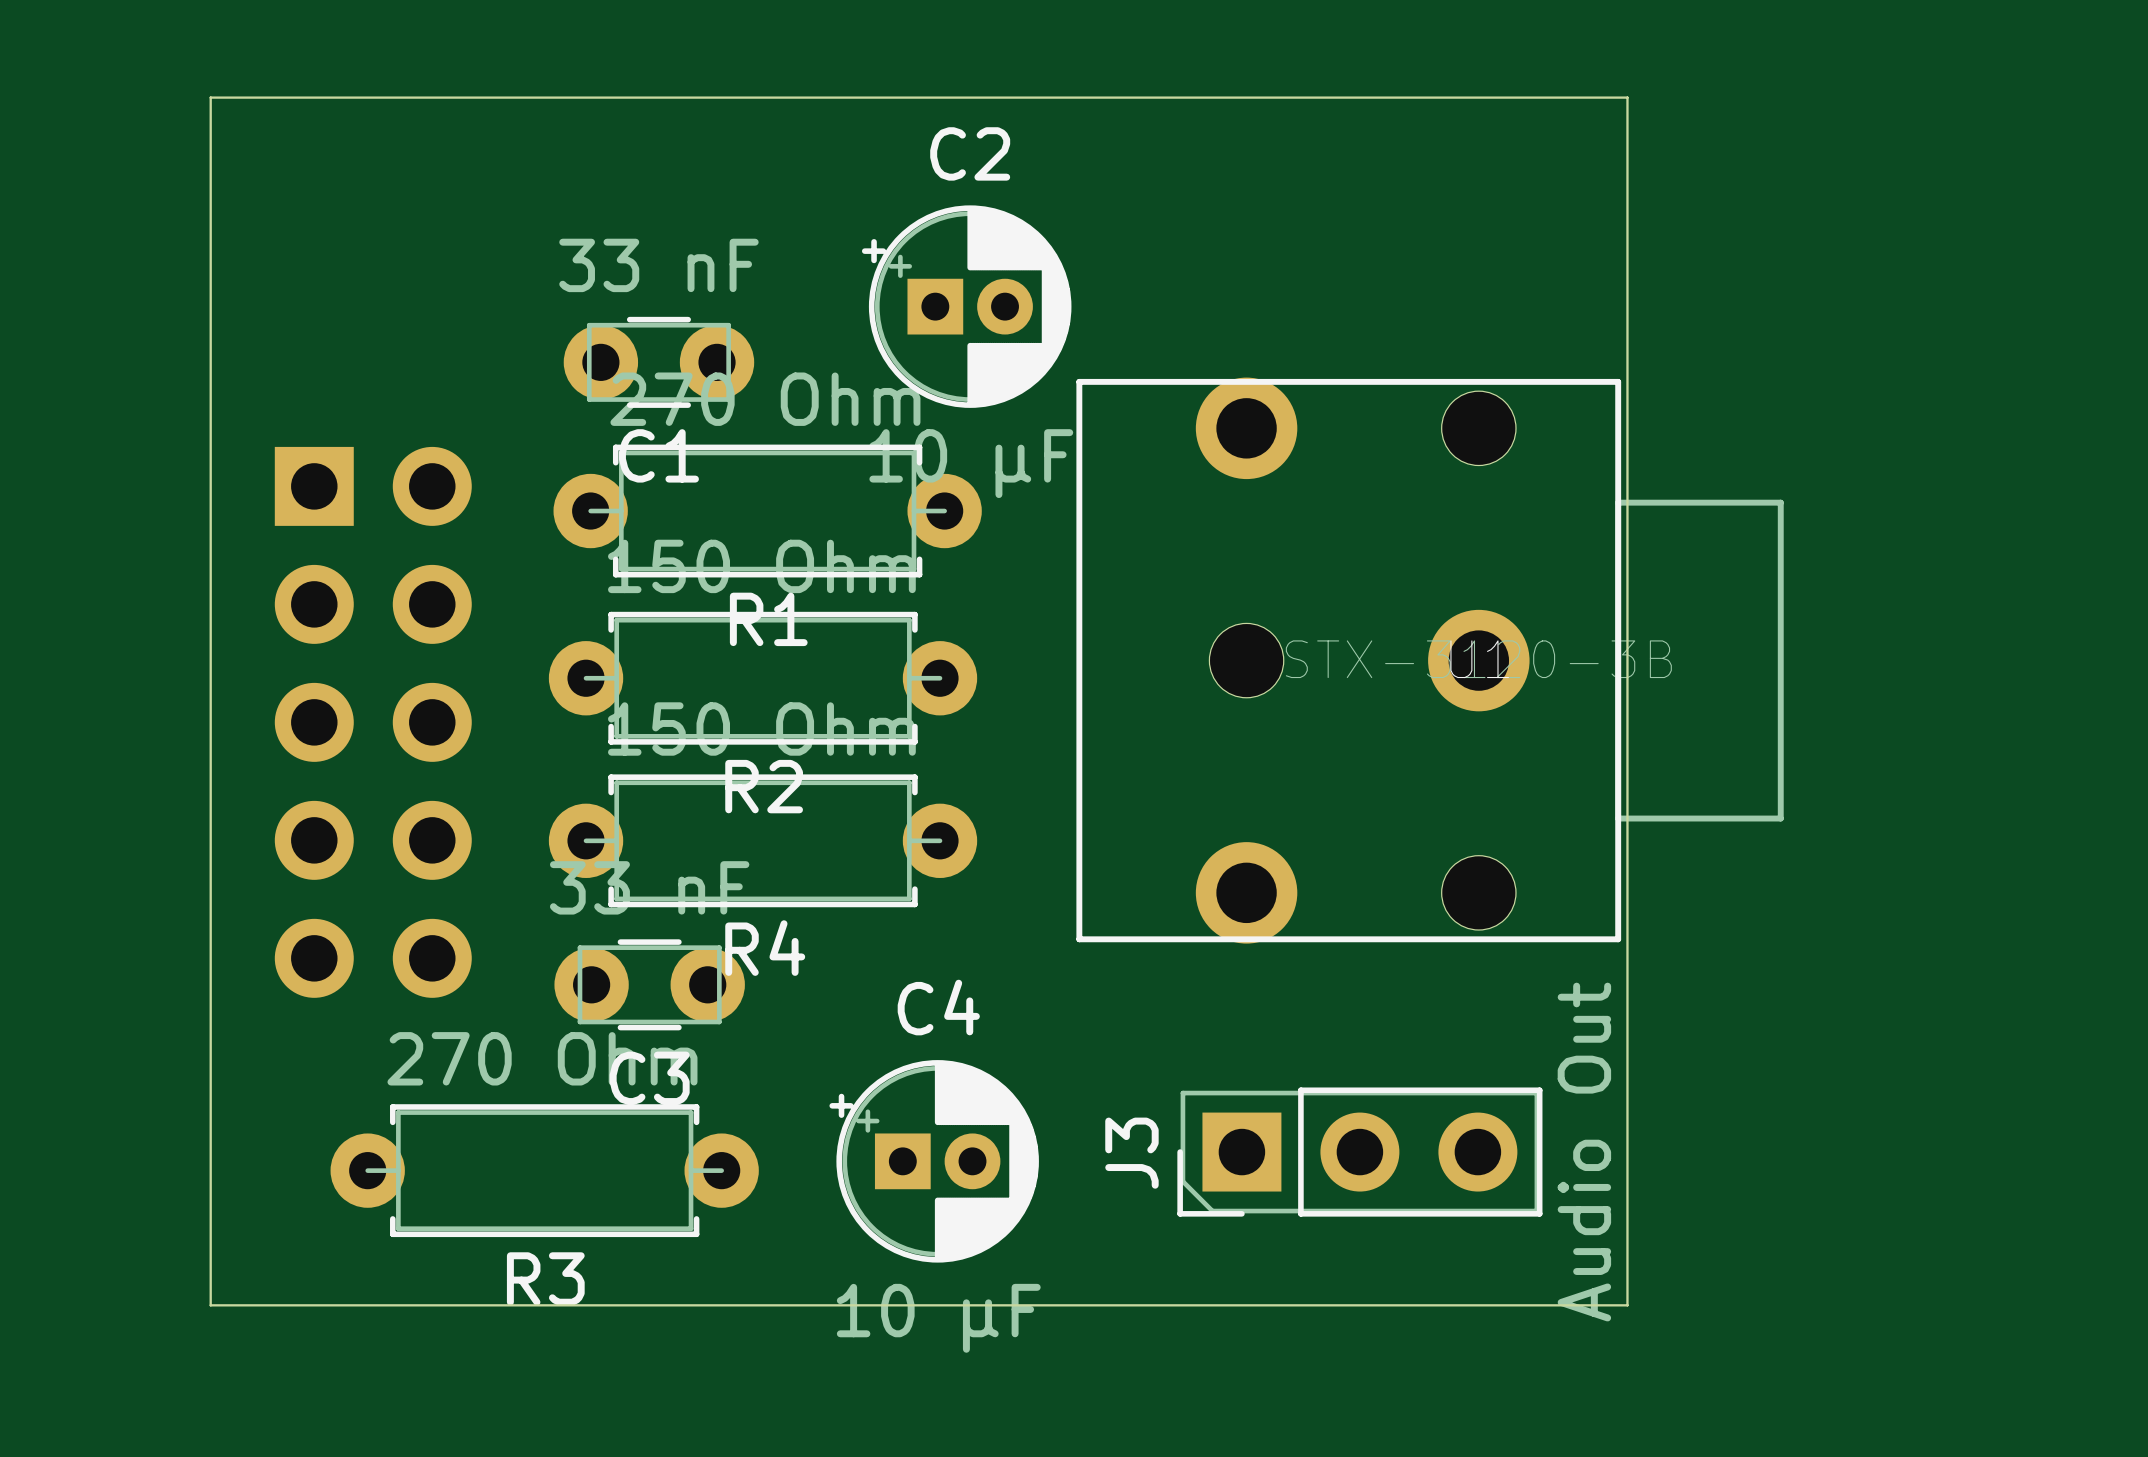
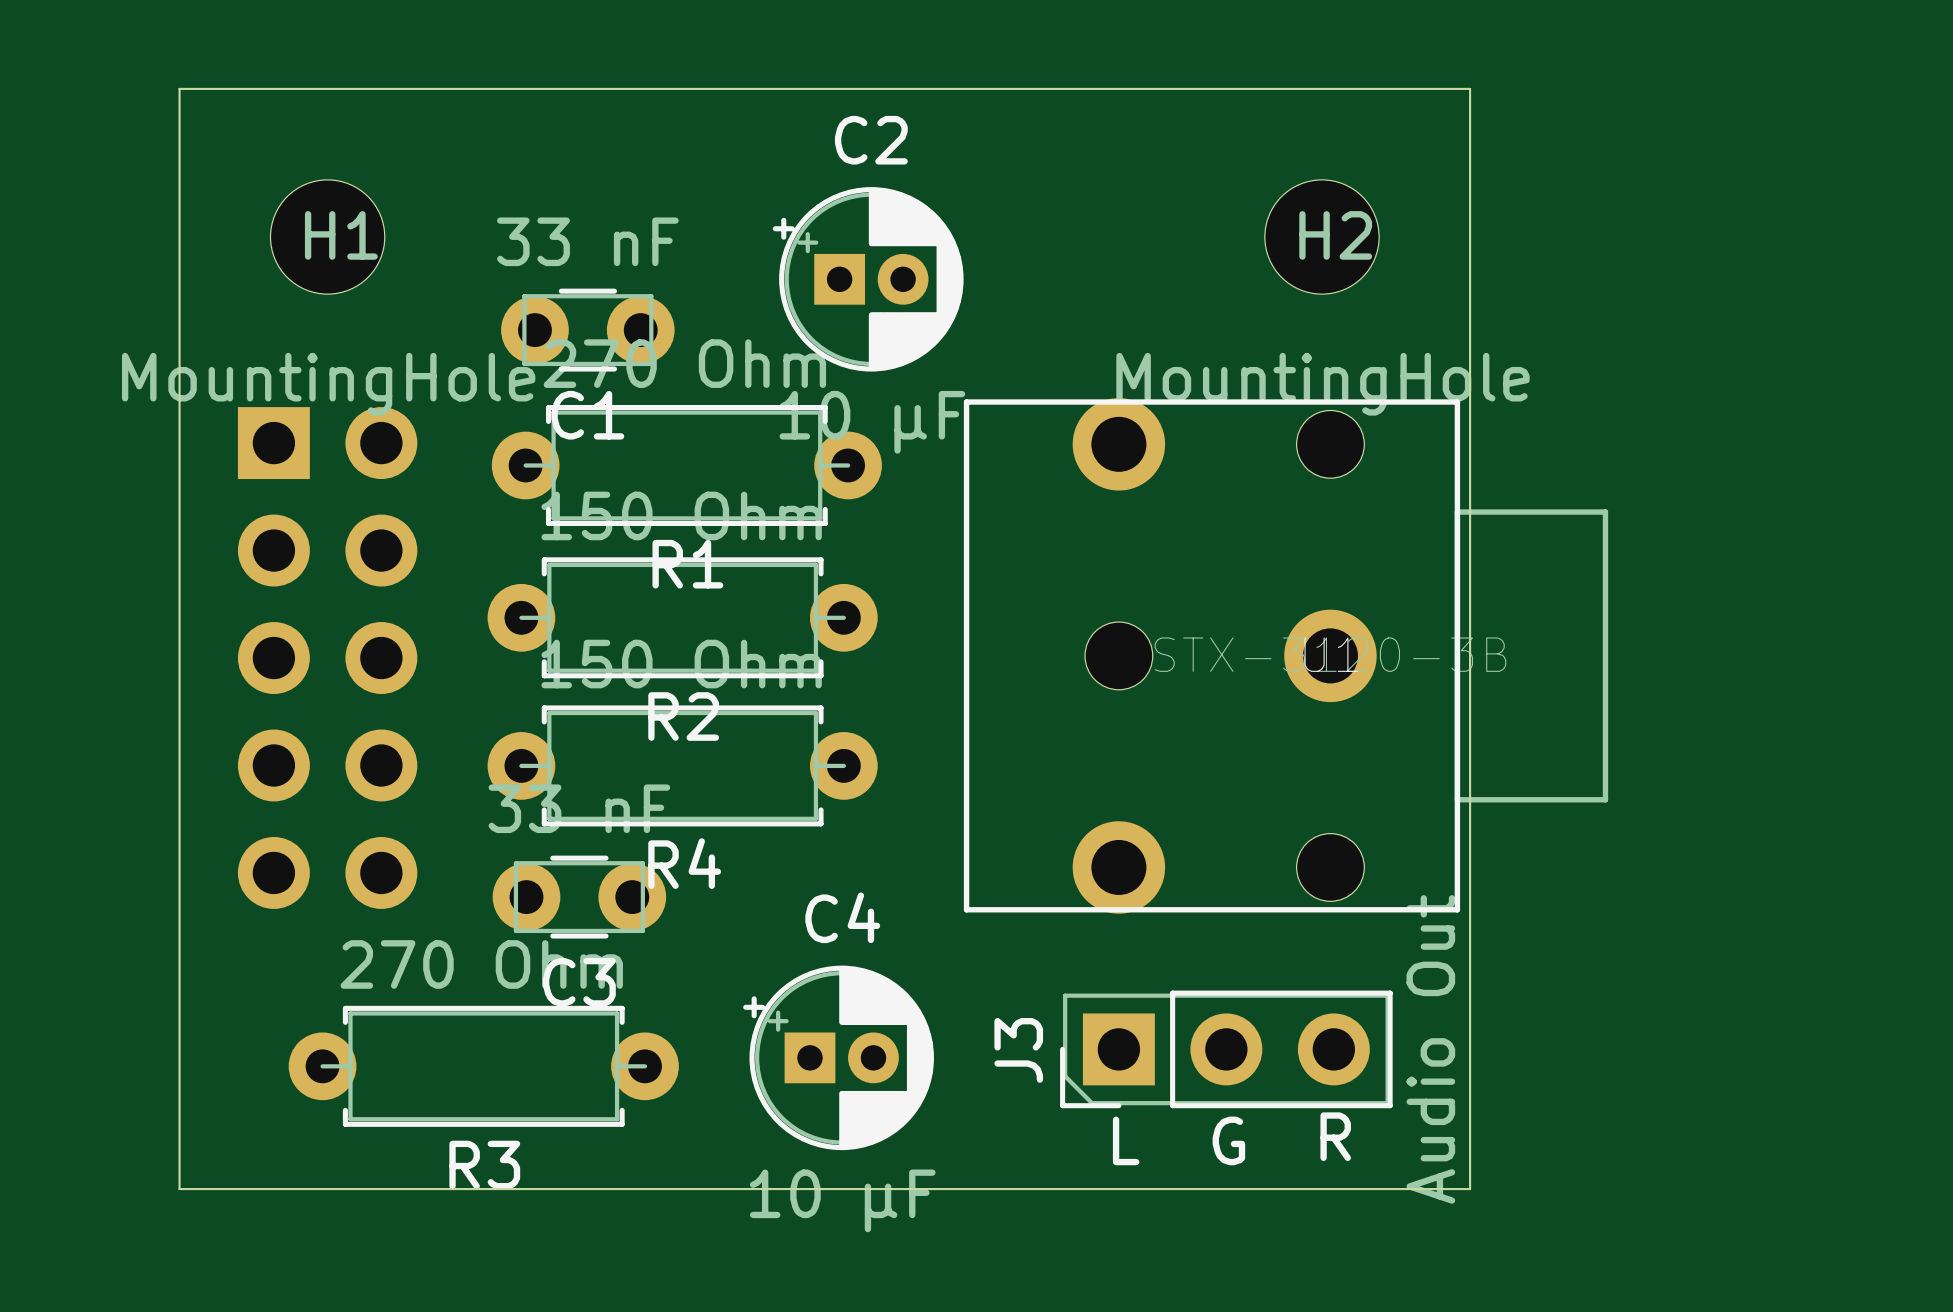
H1: none -> MountingHole (327, 237)
H2: none -> MountingHole (1321, 237)
U1 position: (1430, 660) -> (1286, 655)
text: none -> R (1335, 1136)
text: none -> L (1126, 1140)
text: none -> G (1228, 1140)

